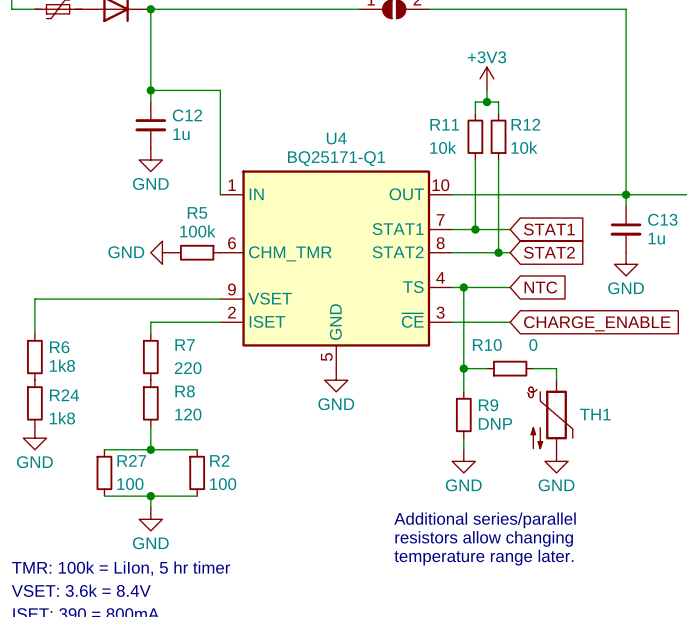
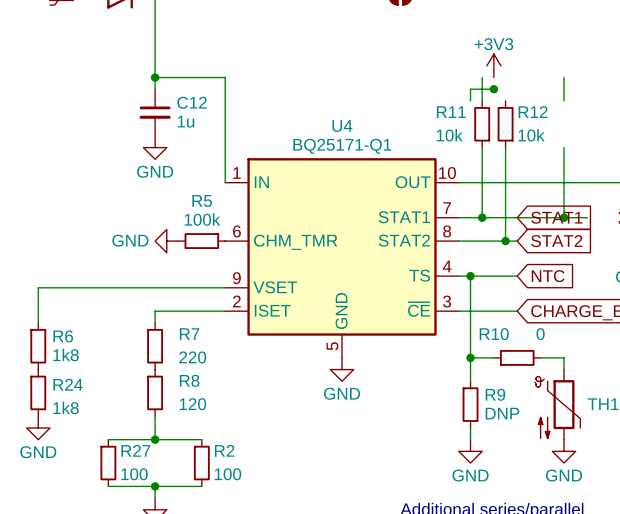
wire: none -> (482, 77) (482, 89) (470, 89) (470, 100)
wire: (486, 90) (486, 102) (498, 102) (498, 113) -> none
wire: none -> (563, 77) (563, 100)
wire: none -> (563, 147) (563, 217)
wire: none -> (517, 217) (587, 217)
junction: none -> (563, 217)

